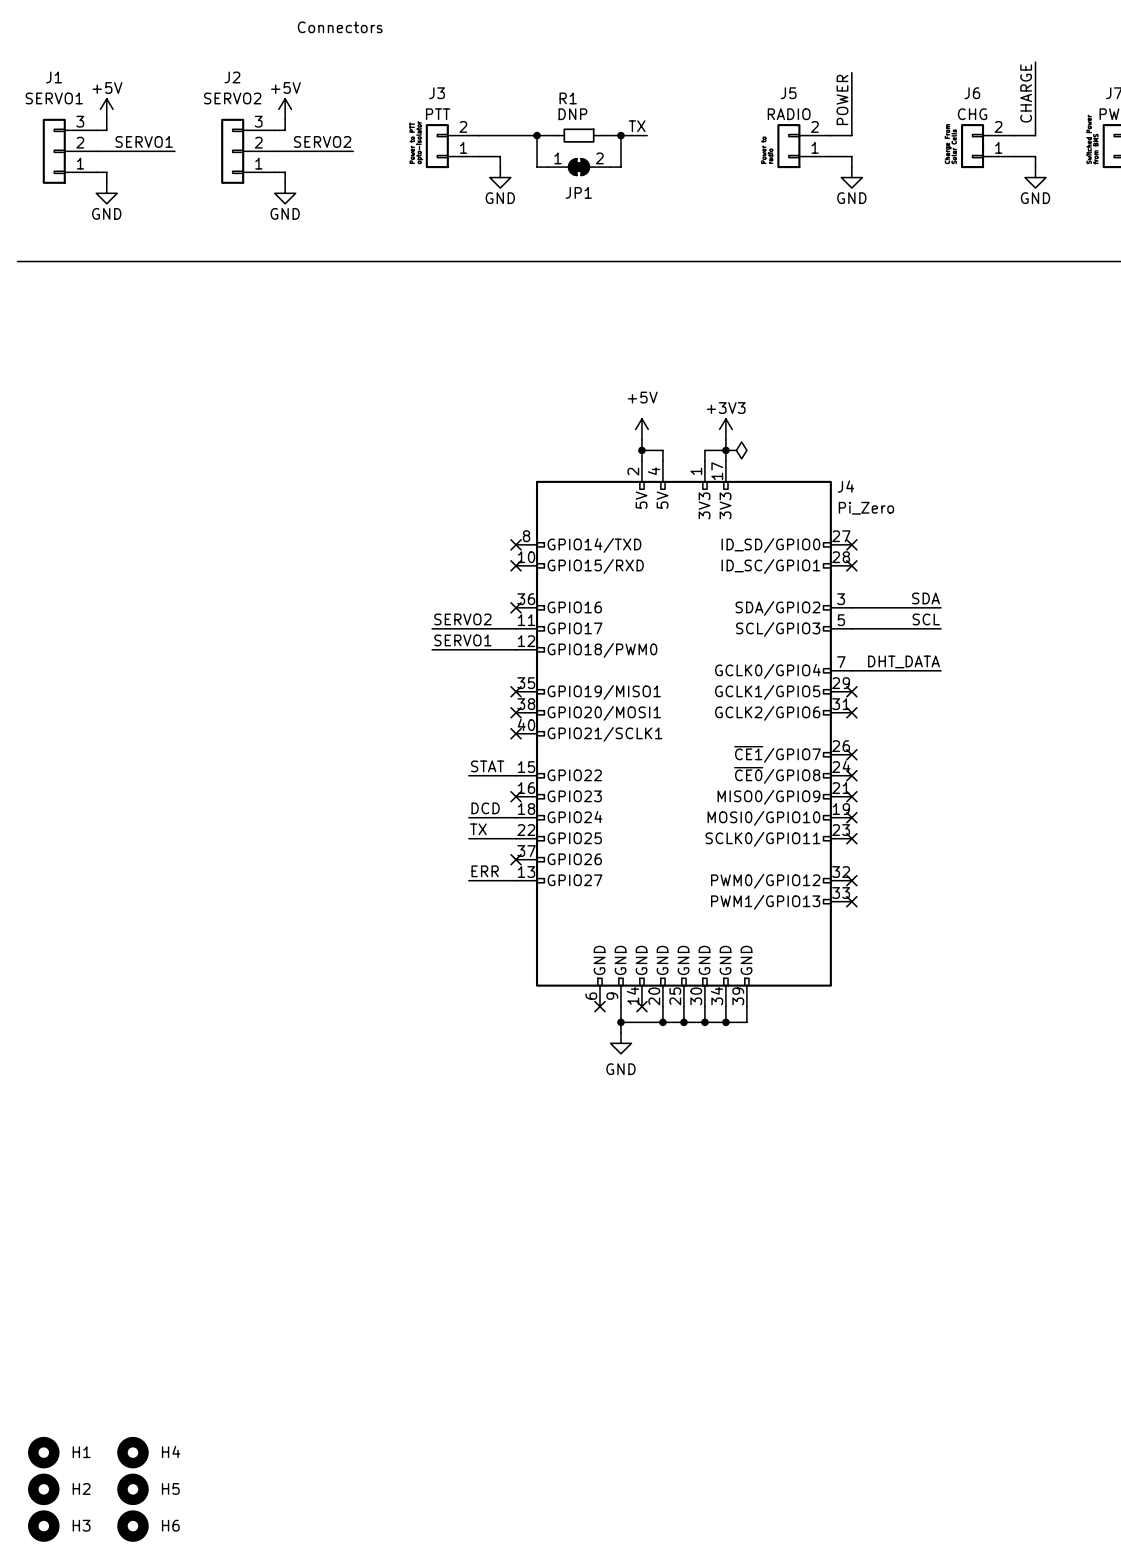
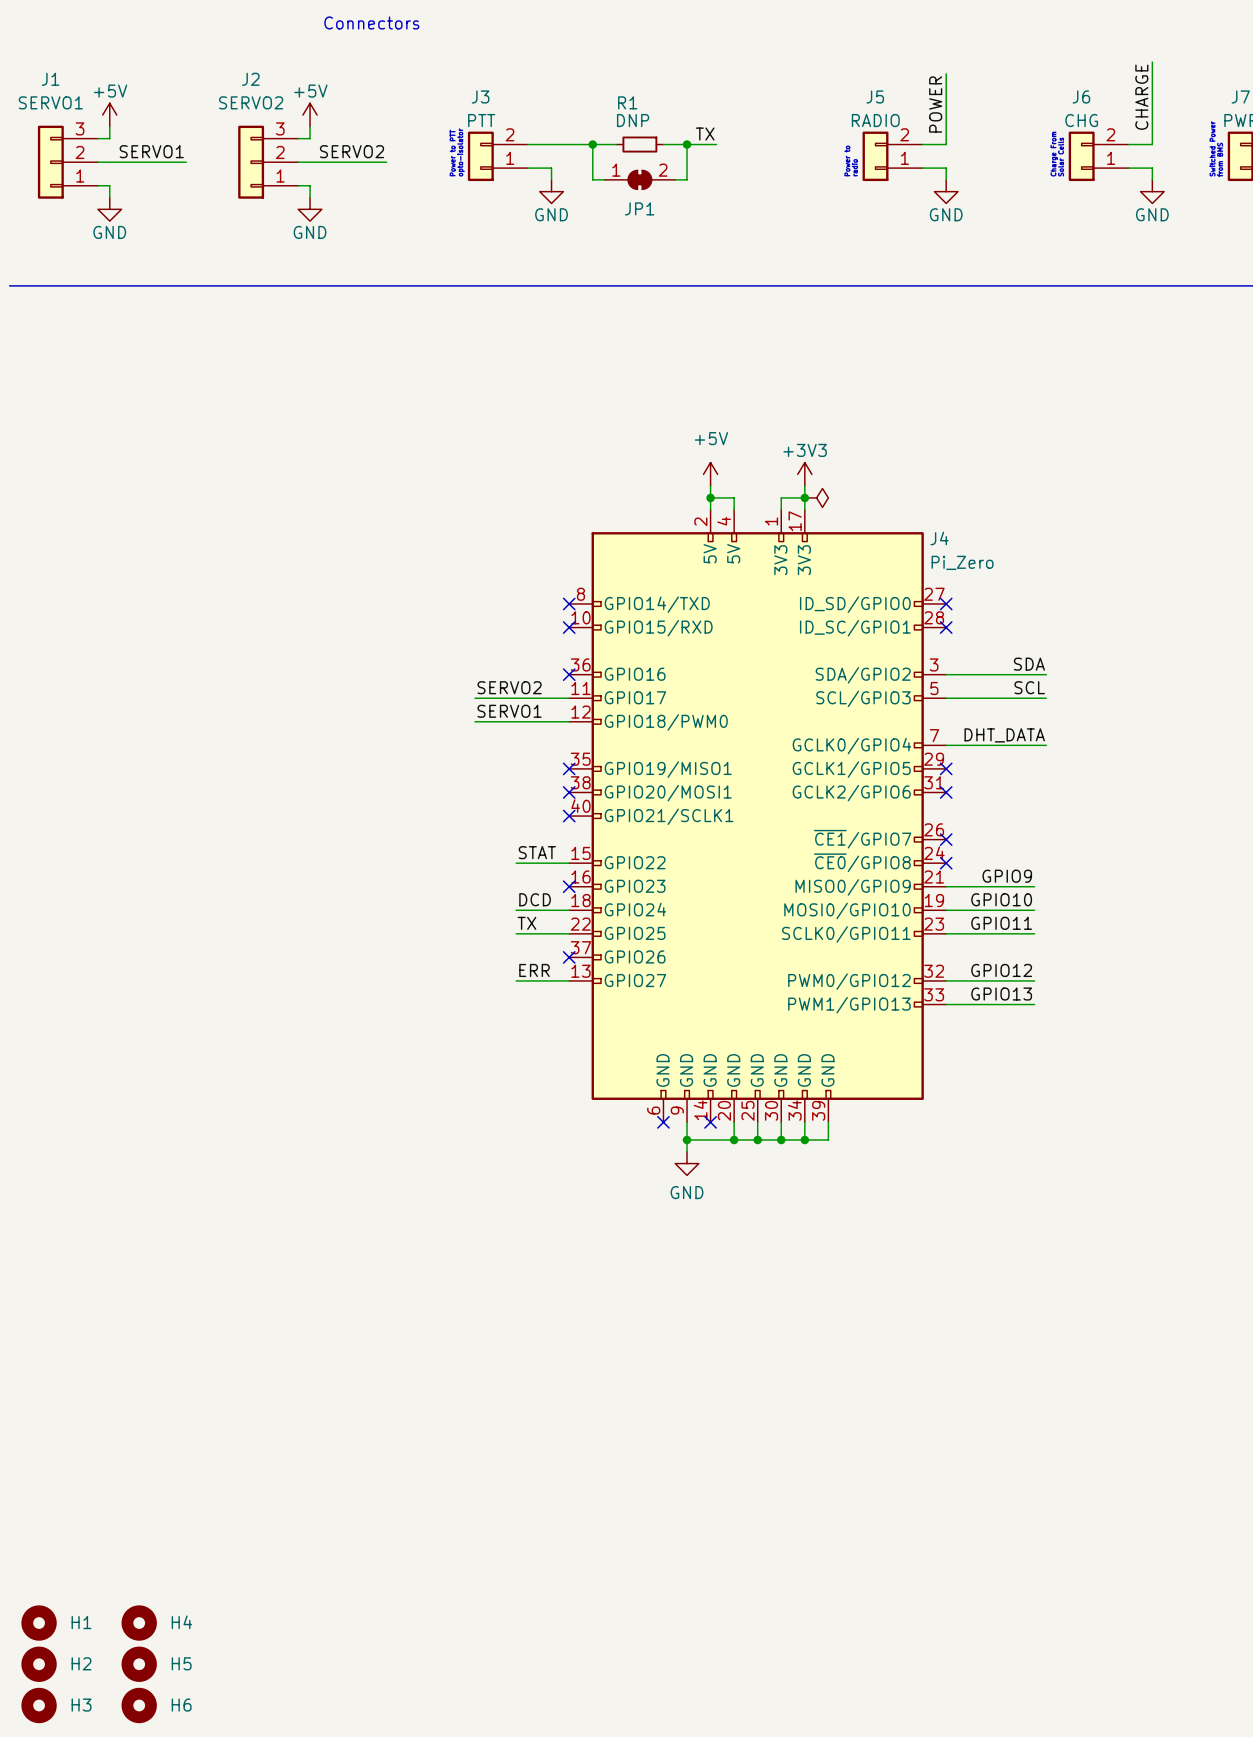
label: none -> GPIO9 (1007, 876)
wire: none -> (946, 886) (1034, 886)
no-connect mark: (851, 796) -> none
label: none -> GPIO10 (1001, 899)
wire: none -> (946, 910) (1034, 910)
no-connect mark: (851, 817) -> none
label: none -> GPIO11 (1001, 923)
wire: none -> (946, 933) (1034, 933)
no-connect mark: (851, 838) -> none
label: none -> GPIO12 (1001, 970)
wire: none -> (946, 980) (1034, 980)
no-connect mark: (851, 880) -> none
label: none -> GPIO13 (1001, 994)
wire: none -> (946, 1004) (1034, 1004)
no-connect mark: (851, 901) -> none

